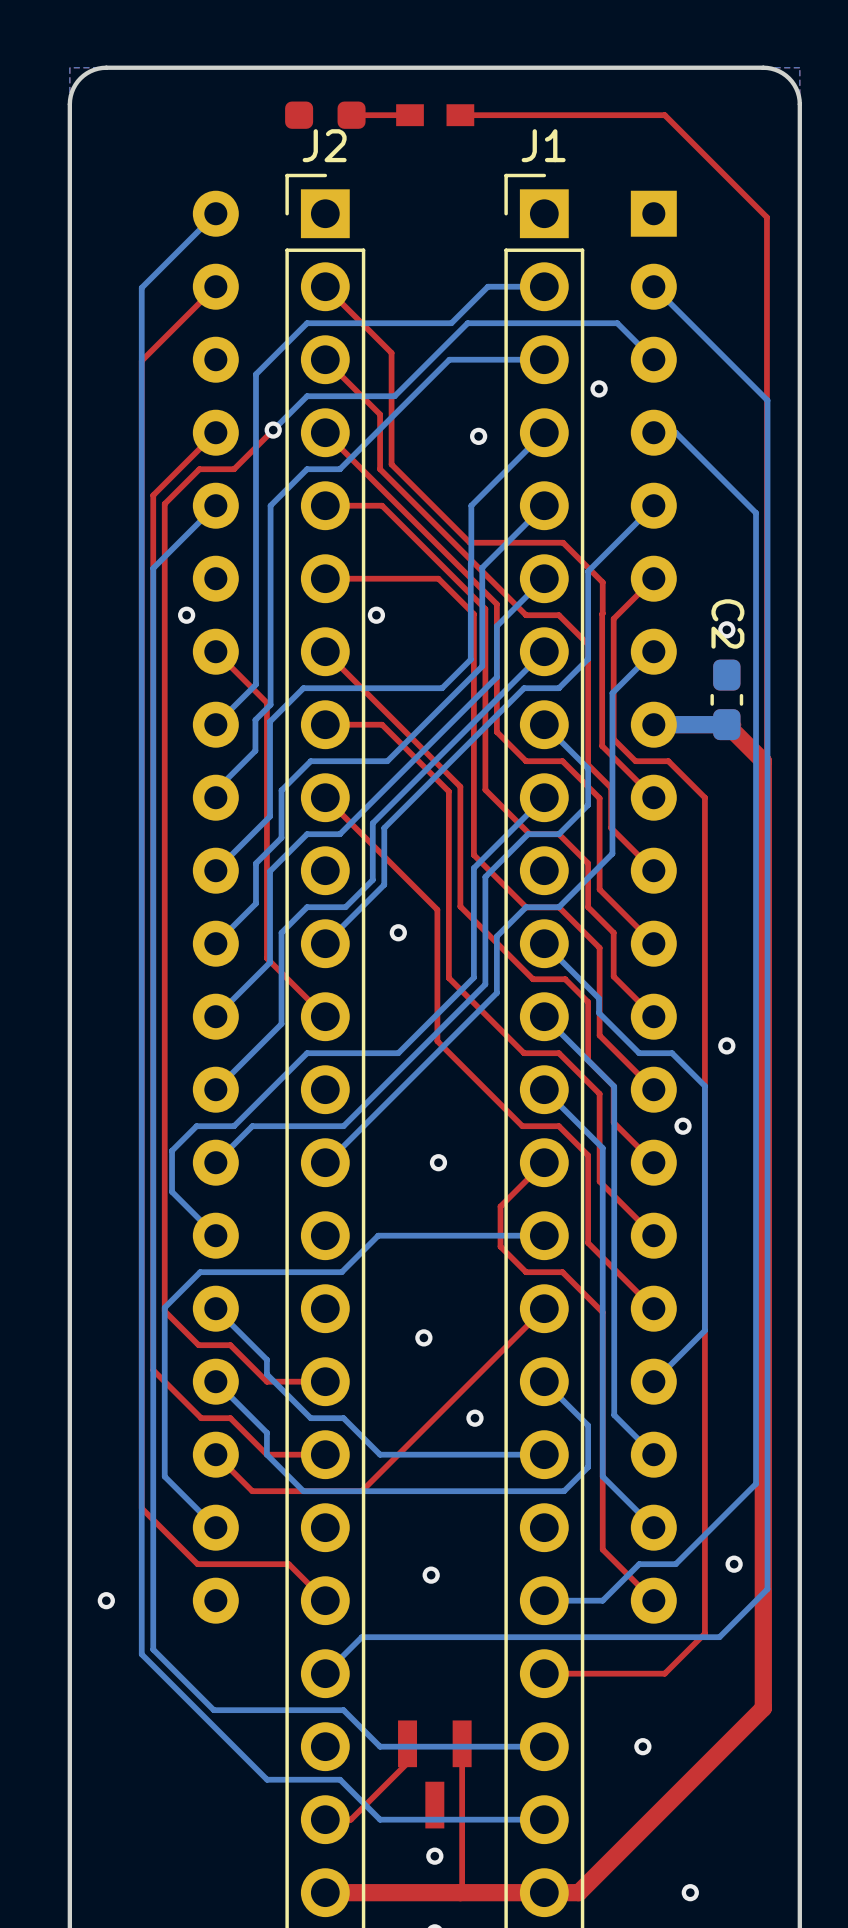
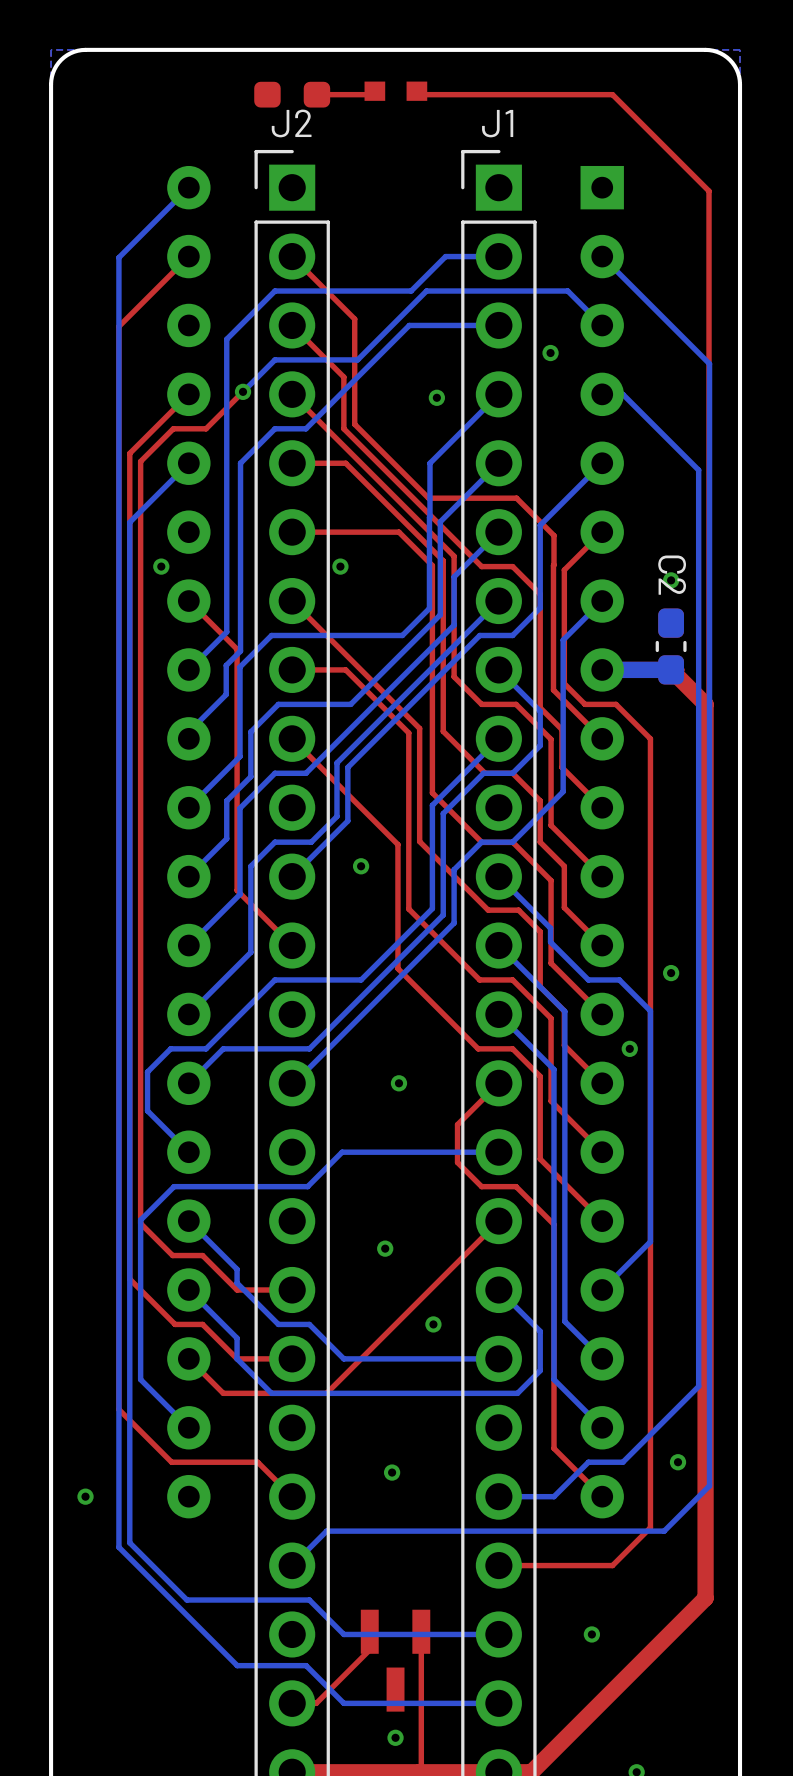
part footprint: [396, 104, 475, 127] -> [364, 81, 428, 101]

